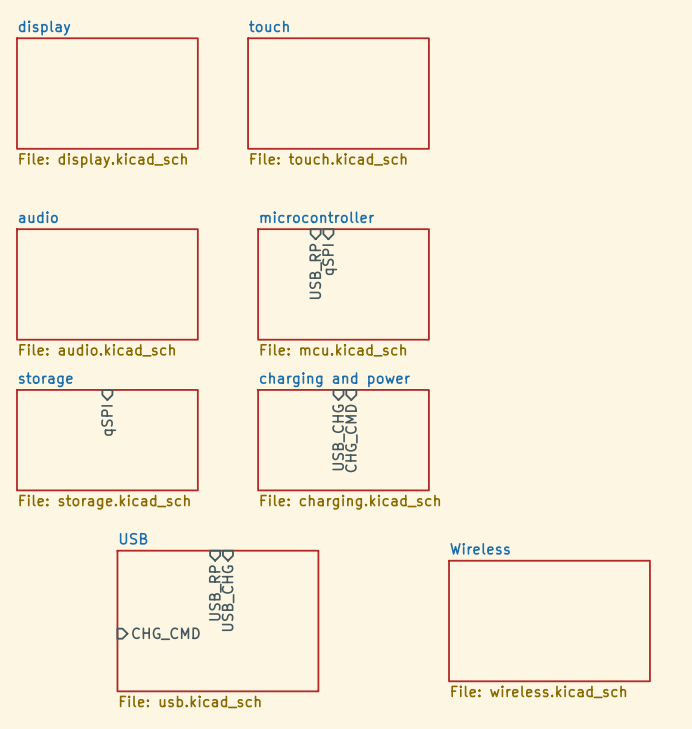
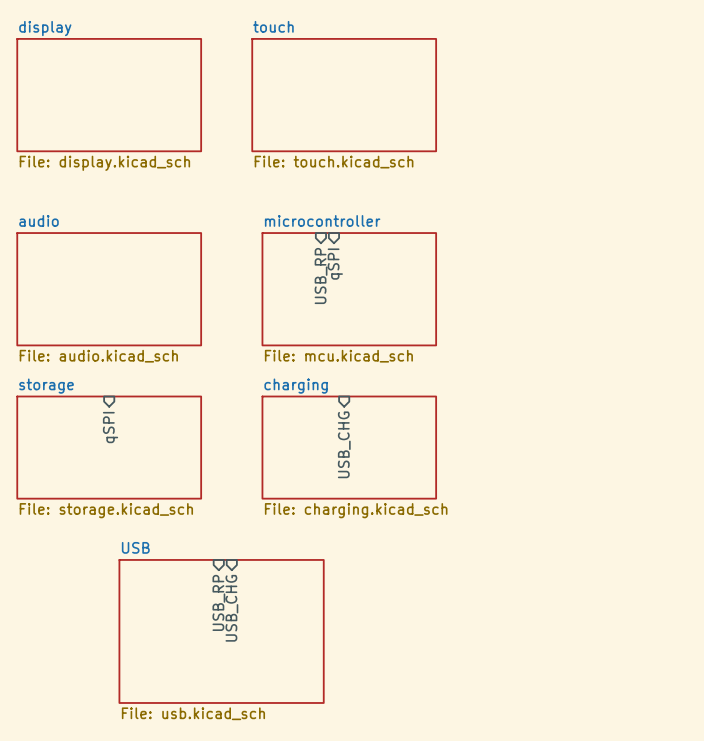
sheet charging and power name: charging and power (334, 379) -> charging (296, 386)
sheet pin: CHG_CMD (351, 438) -> none
sheet Wireless: File: wireless.kicad_sch (549, 621) -> none
sheet pin: CHG_CMD (165, 633) -> none

